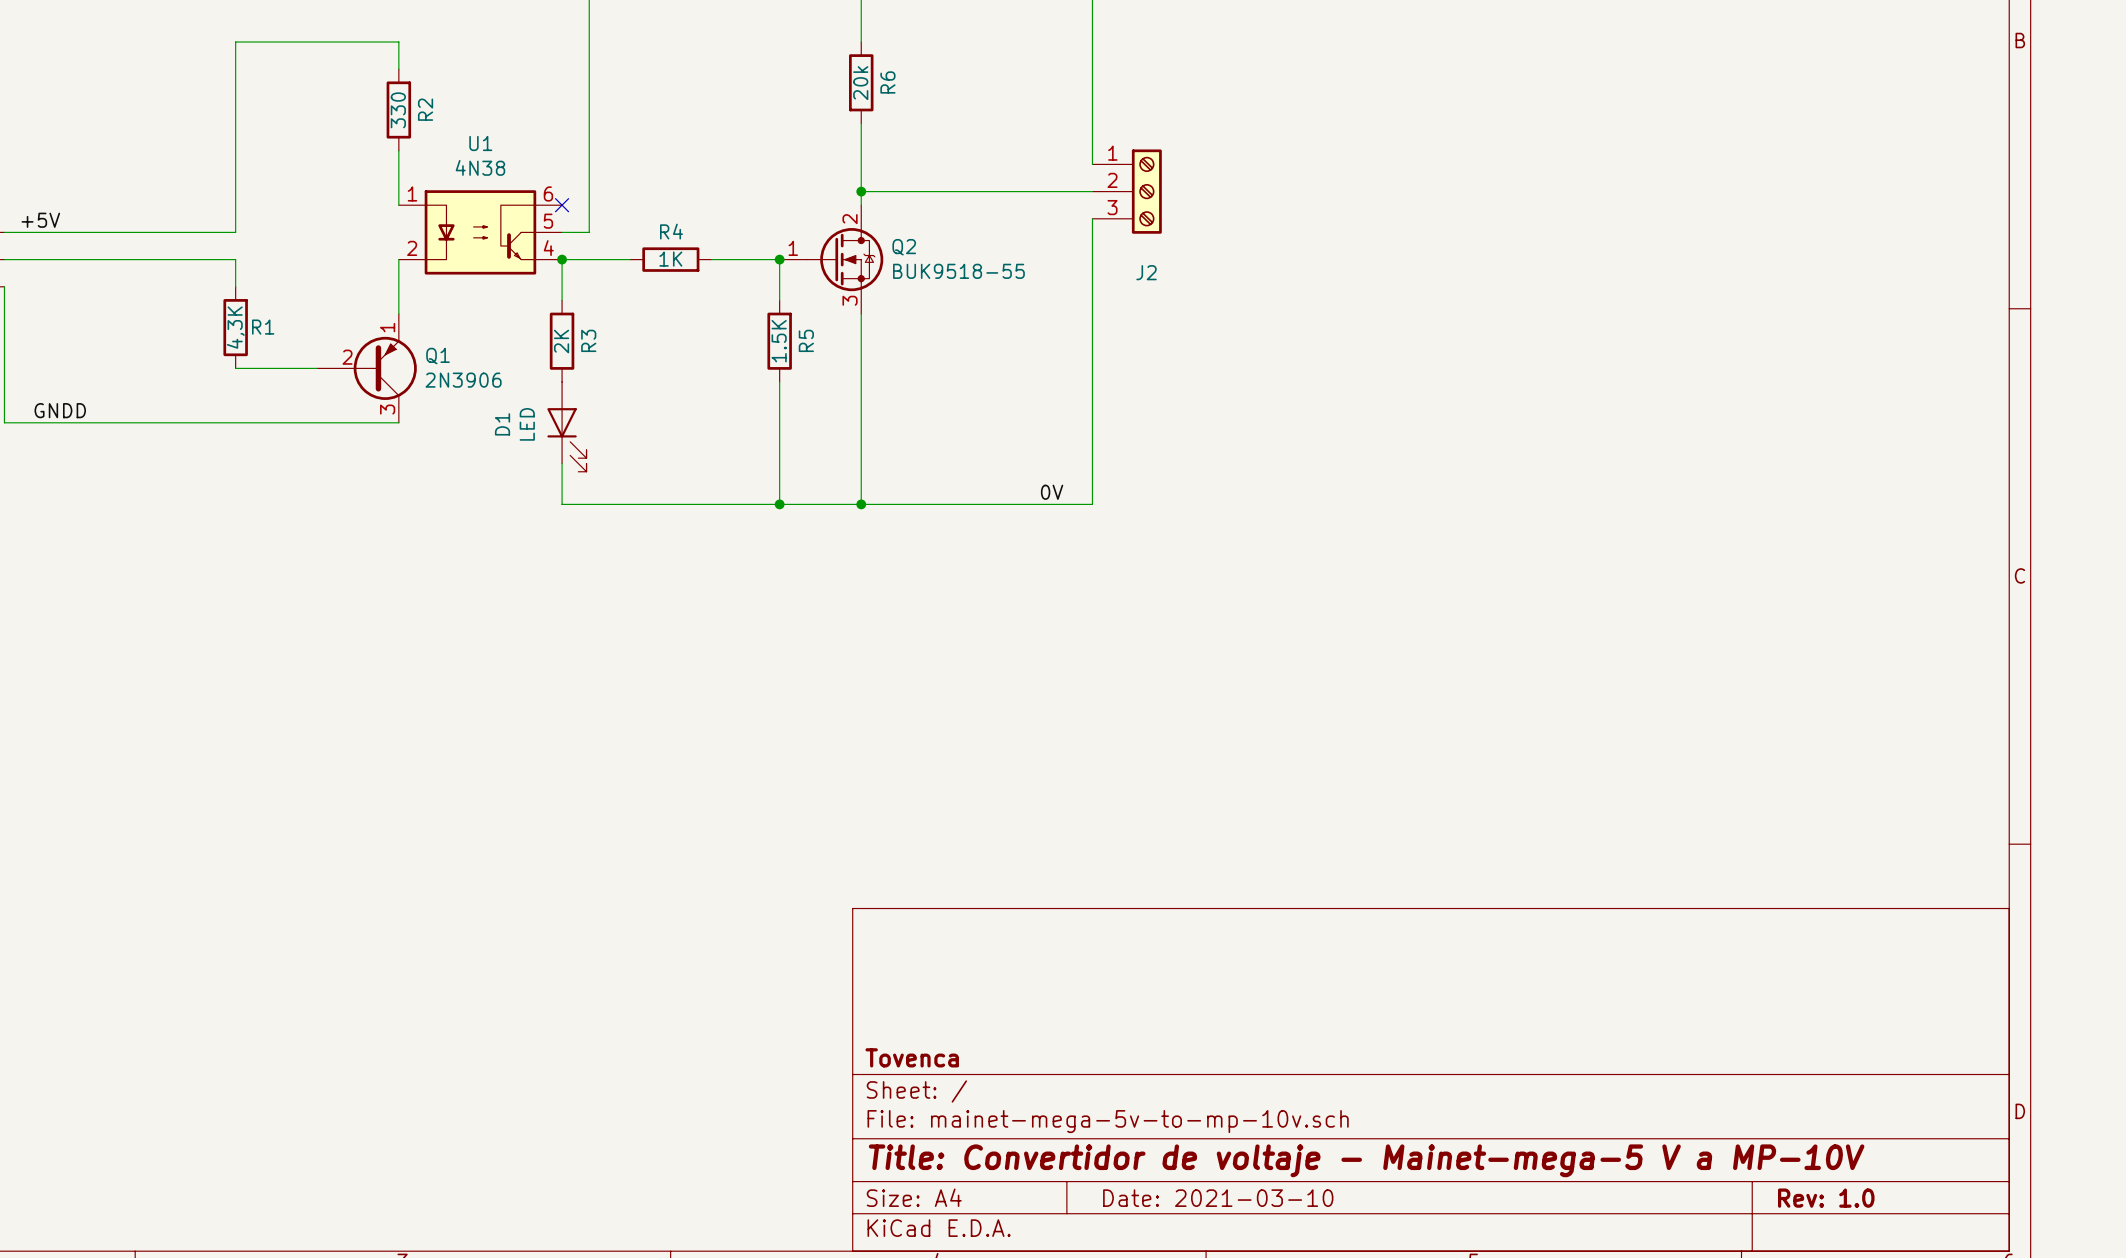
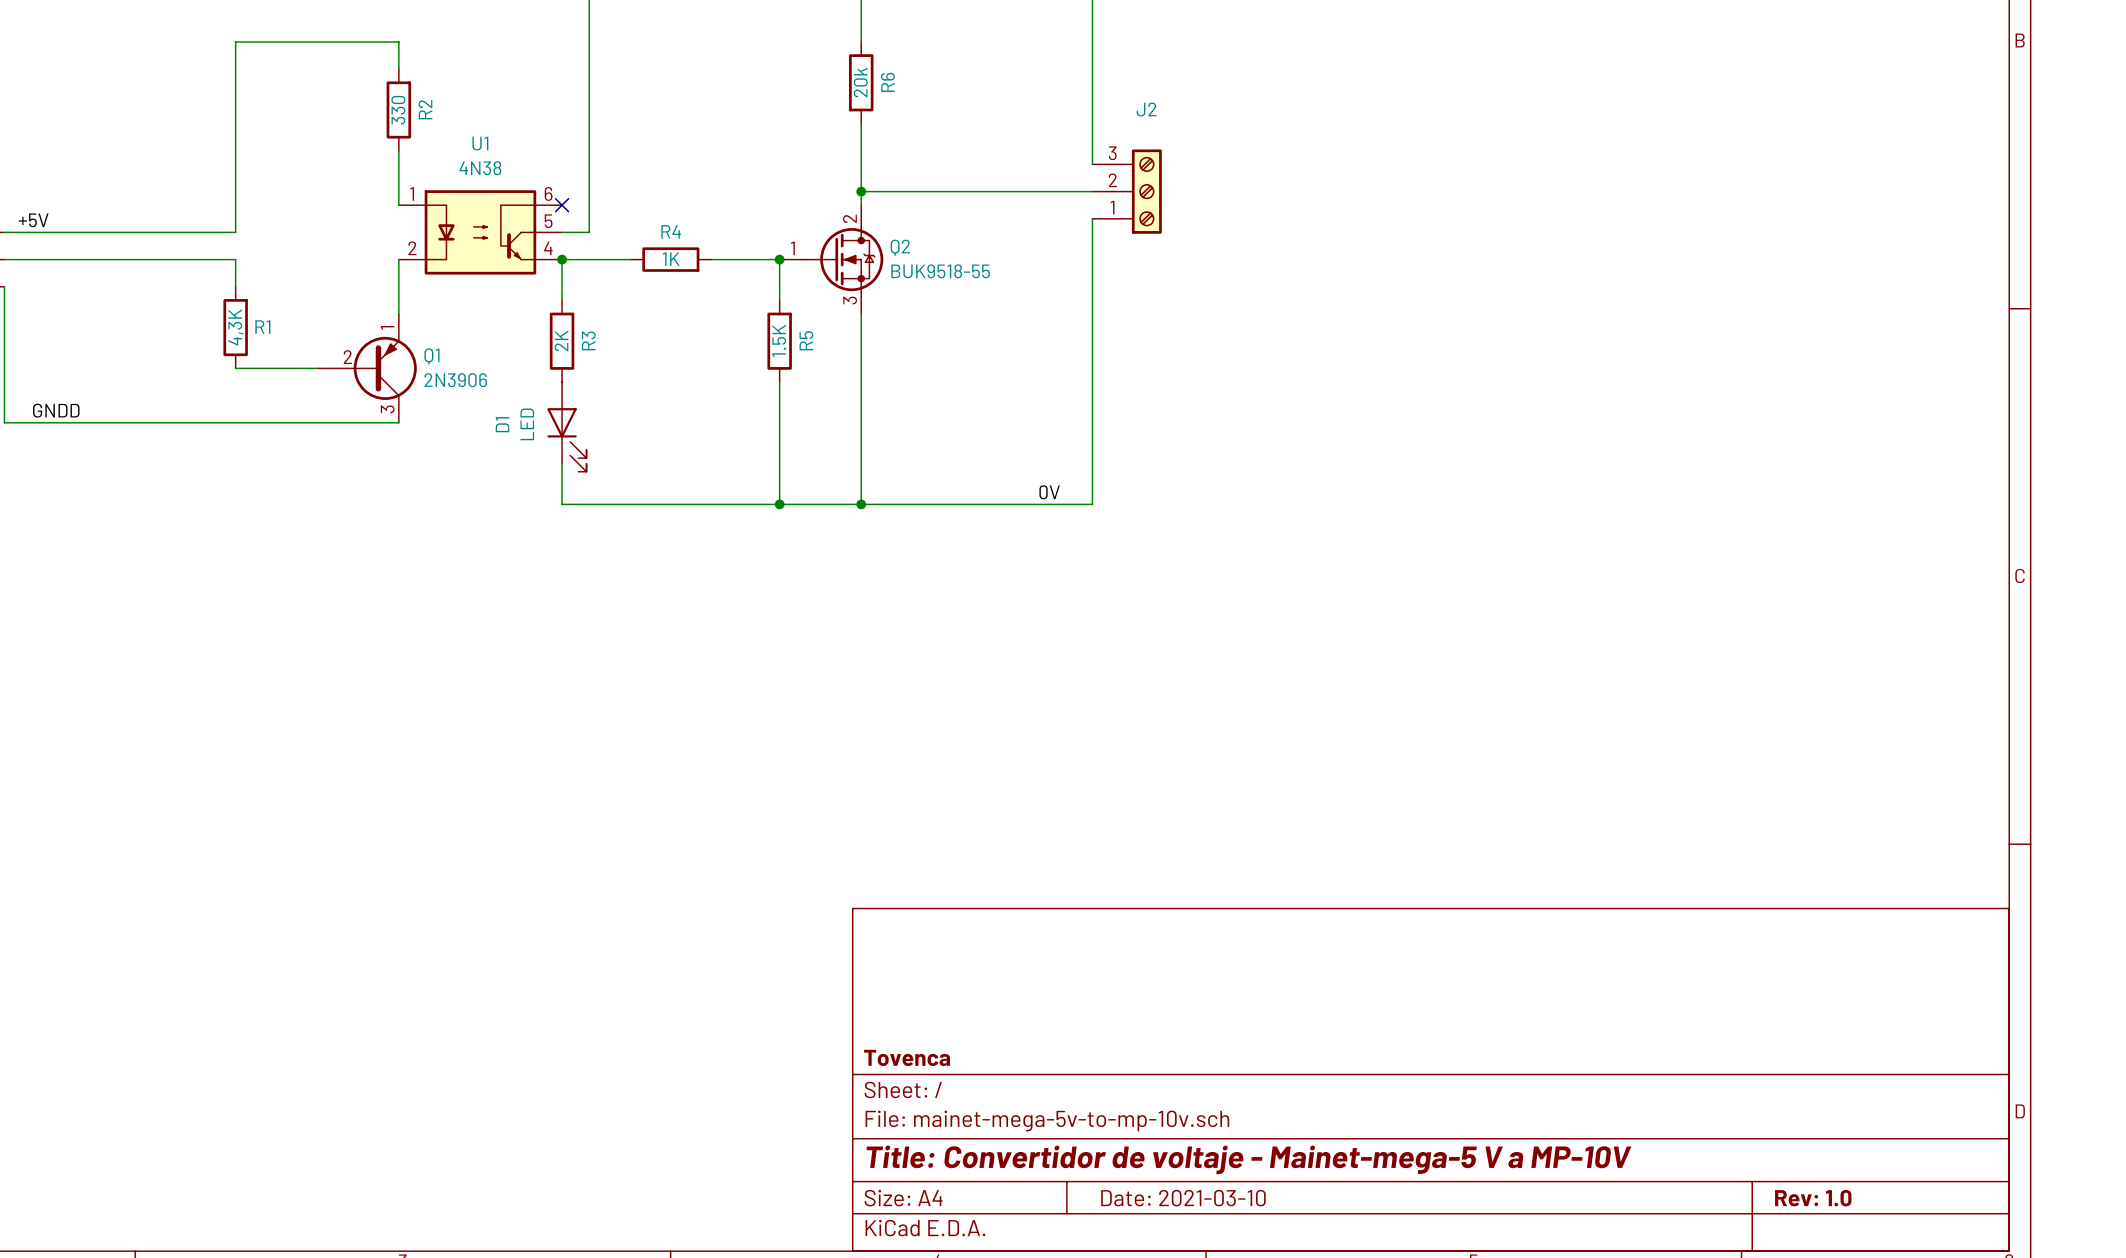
J2 flip: as is (1146, 191) -> up-down (1146, 191)

